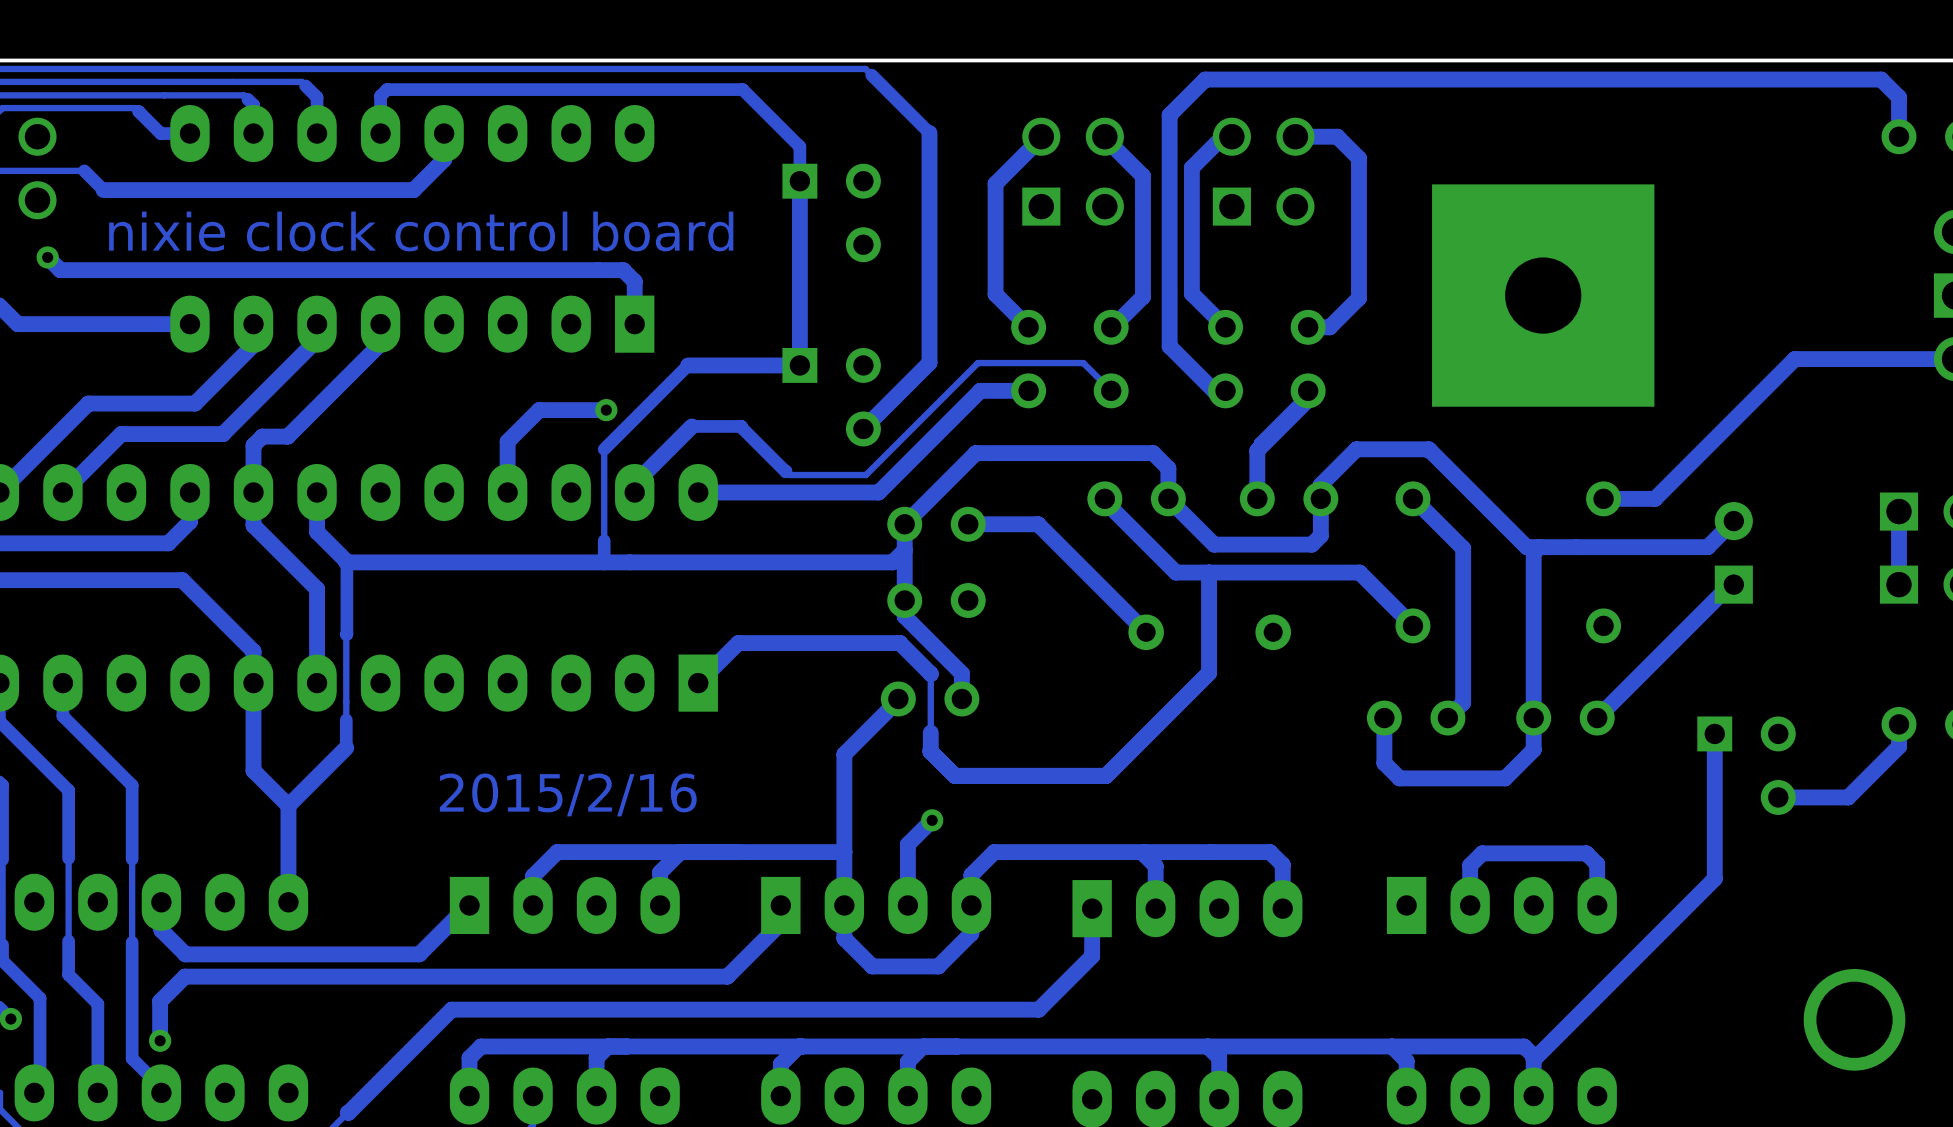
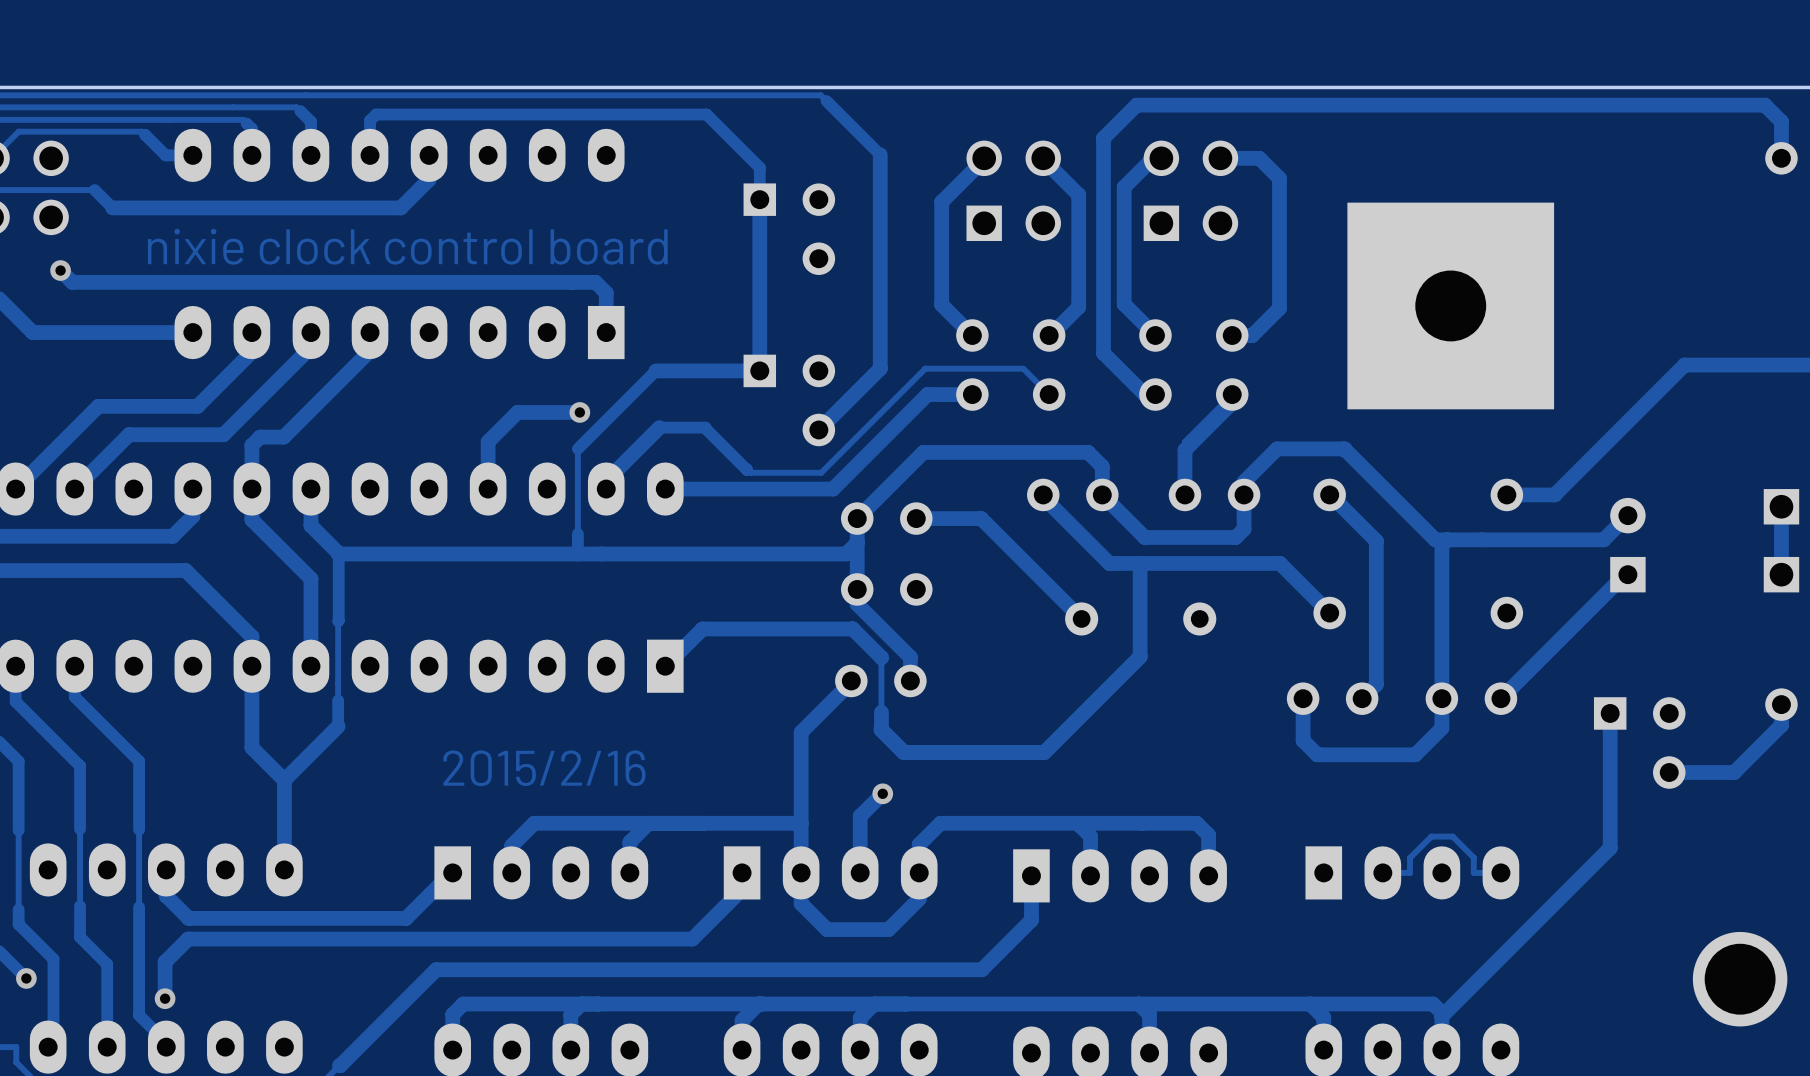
track: (1597, 905) (1597, 864) (1586, 853) (1482, 853) (1470, 865) (1470, 905) -> (1500, 872) (1473, 872) (1473, 857) (1452, 836) (1431, 836) (1410, 857) (1410, 872) (1382, 872)

